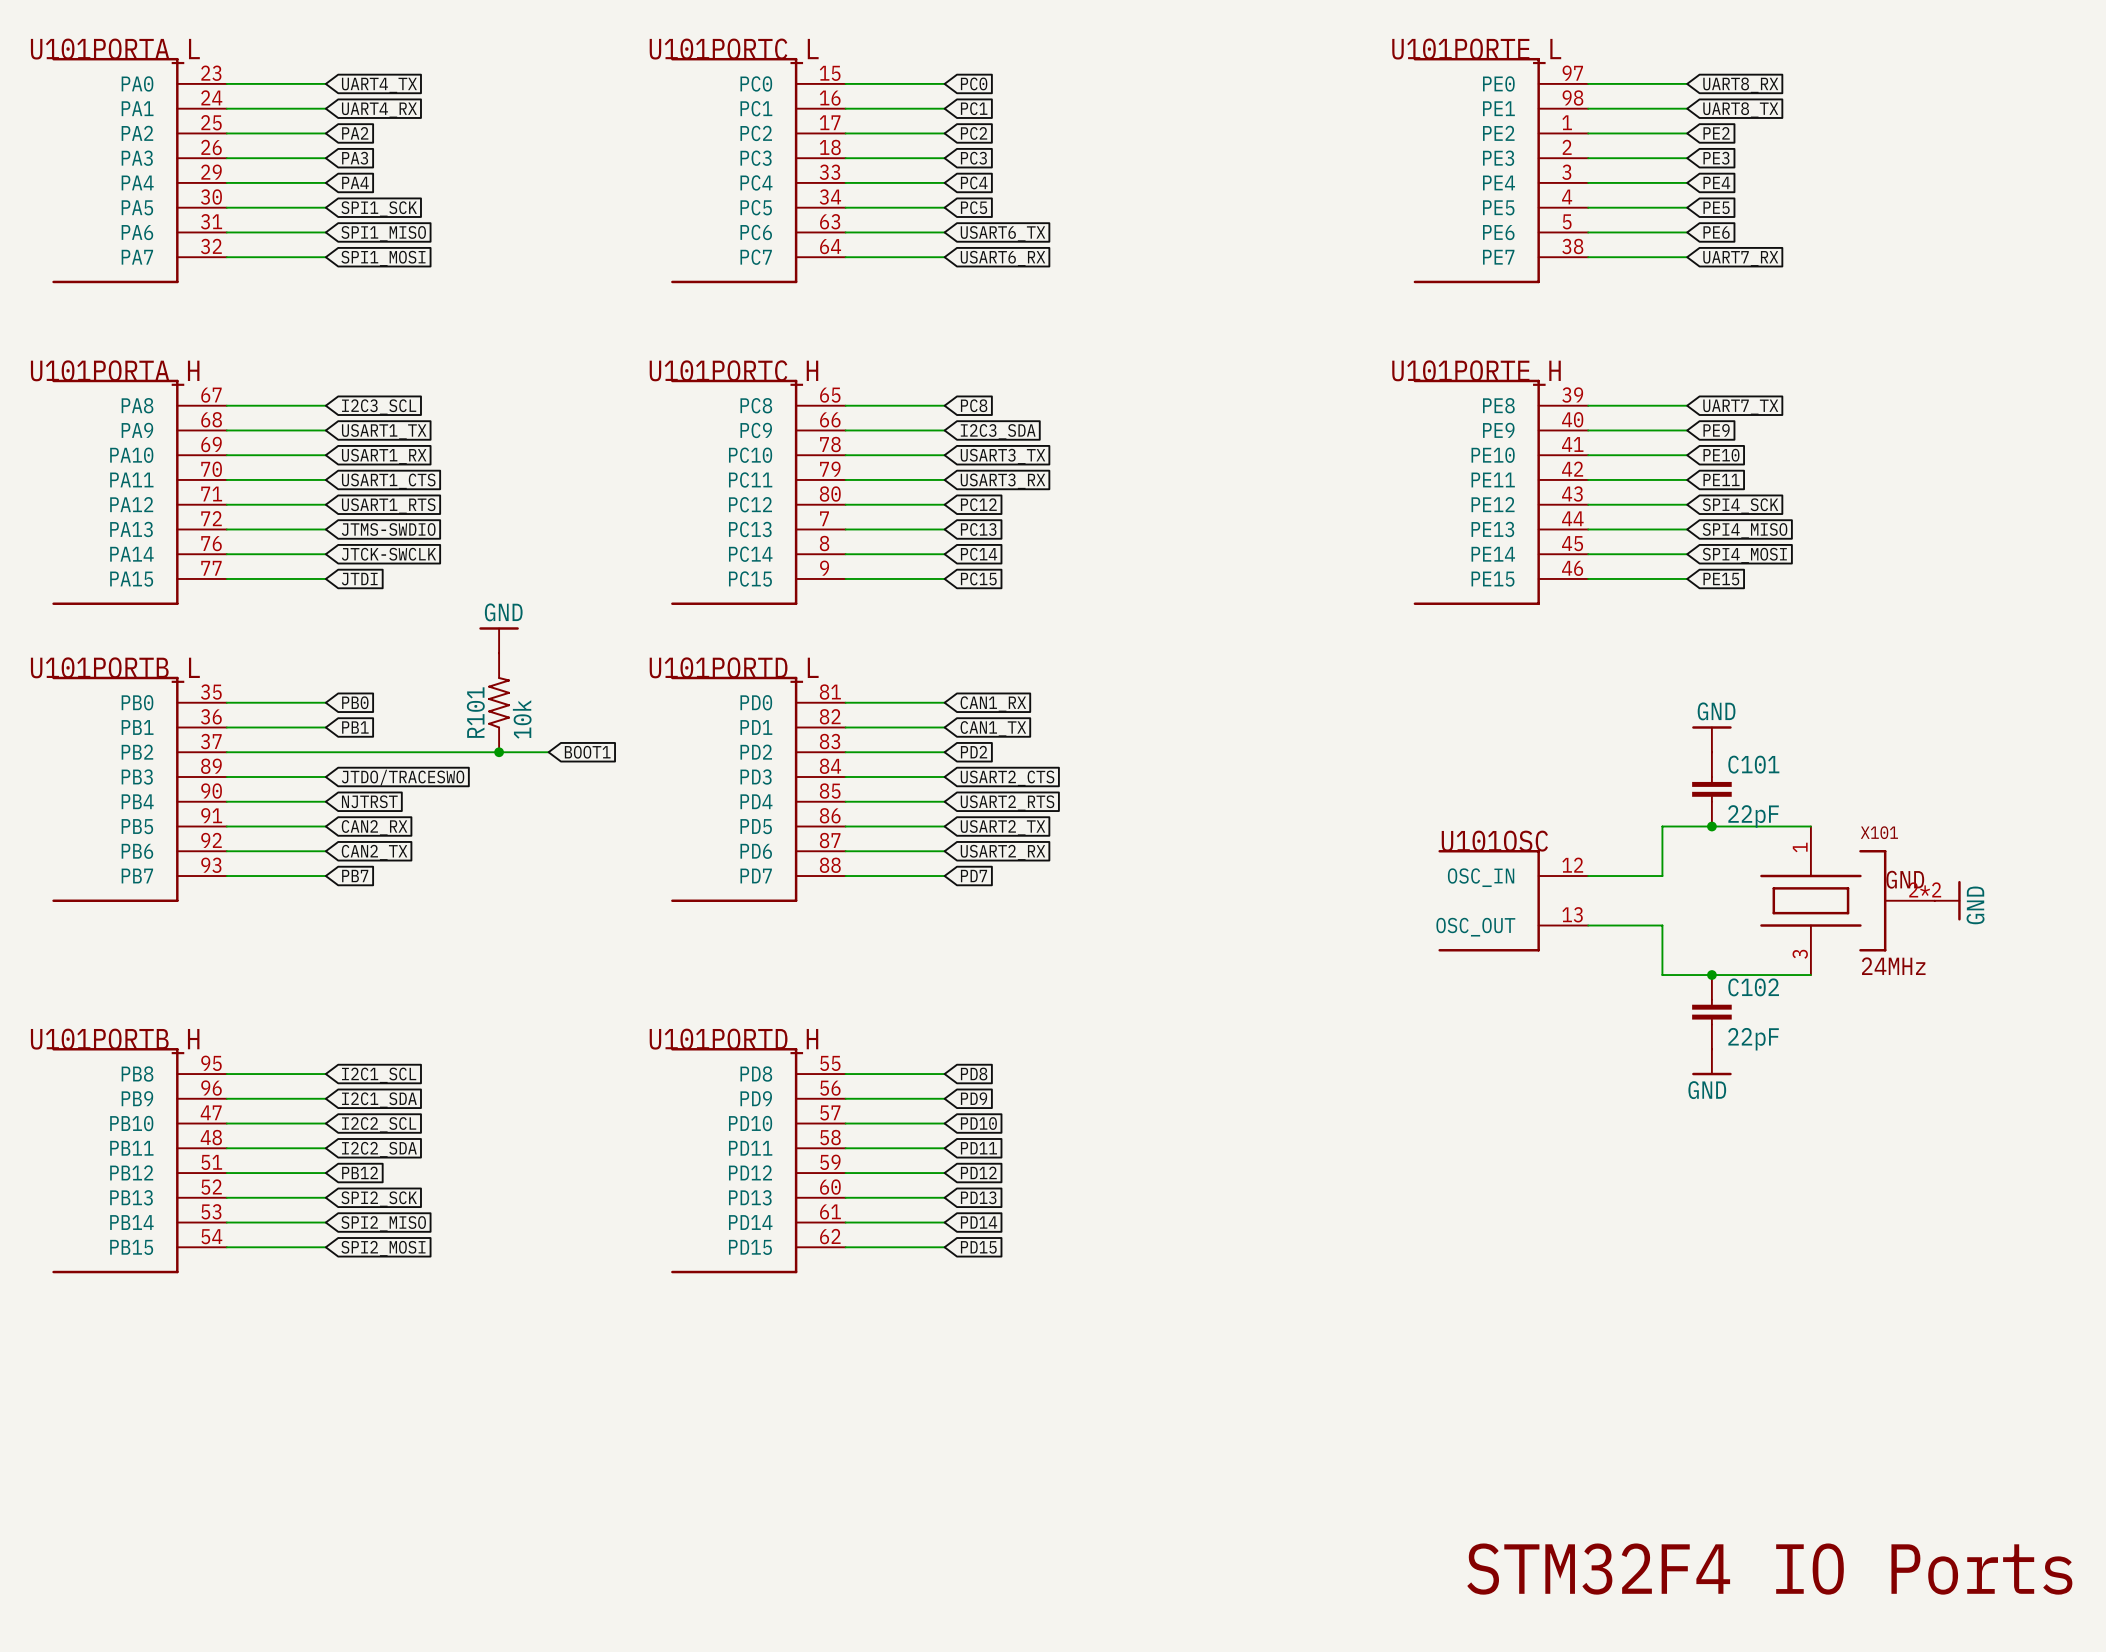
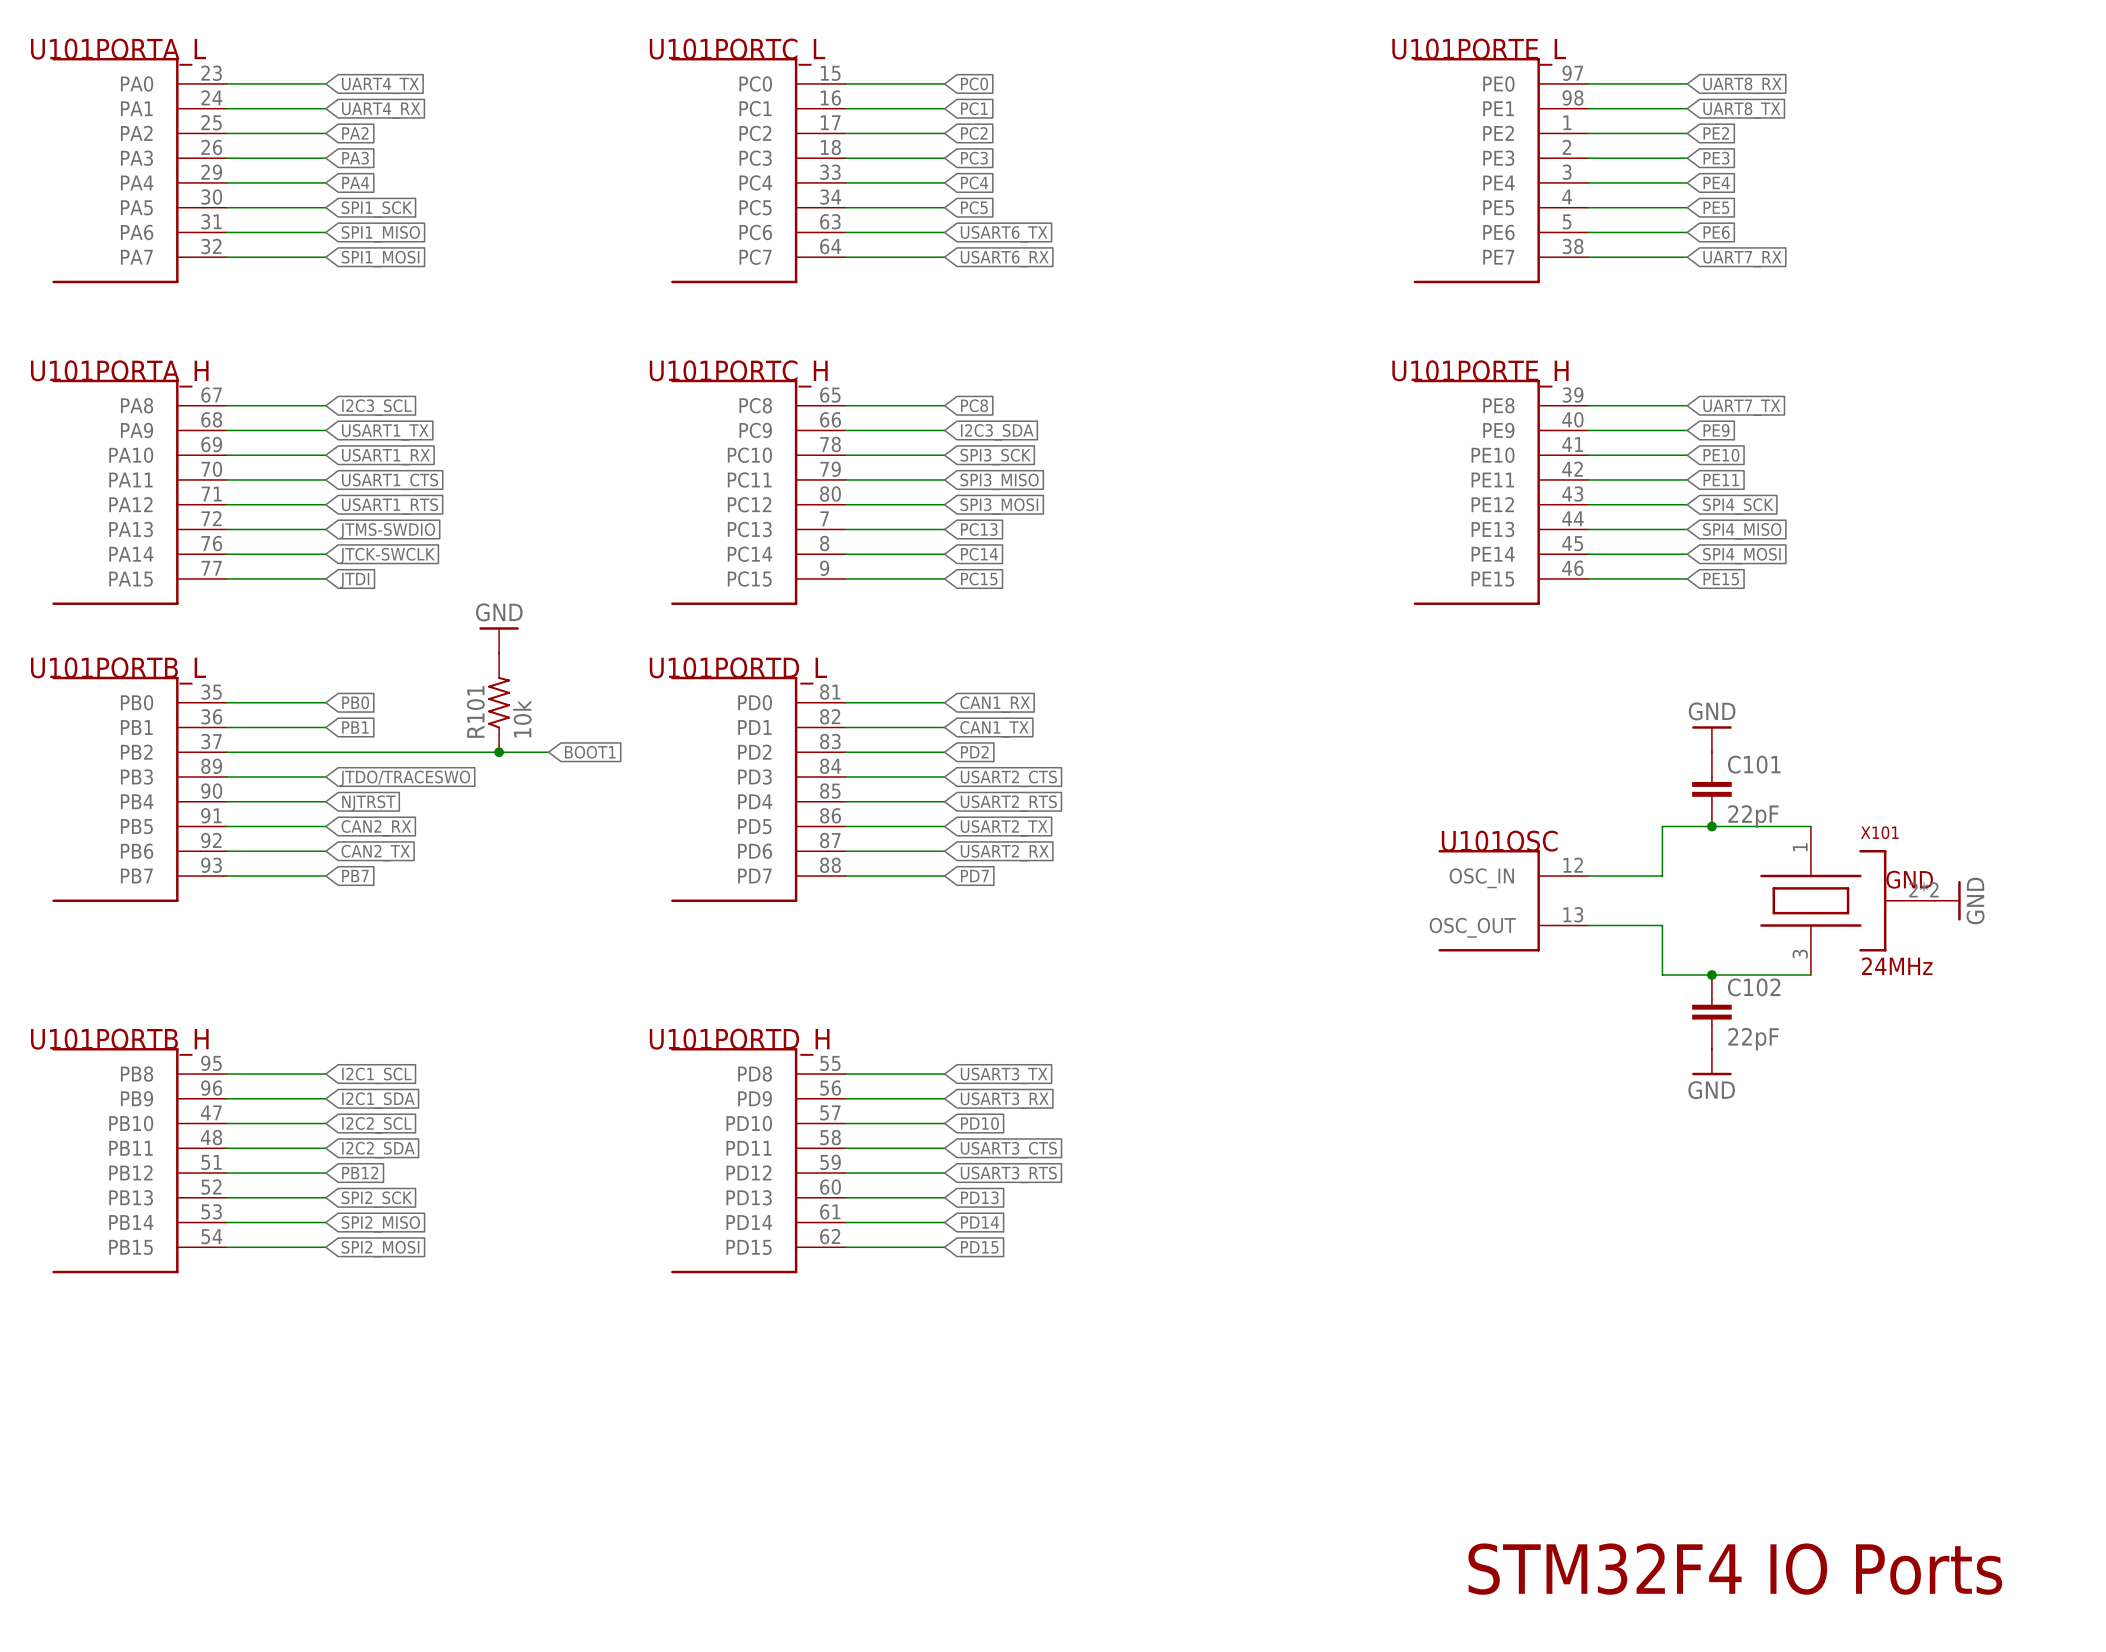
global label: USART3_TX (1002, 456) -> SPI3_SCK (995, 457)
global label: USART3_RX (1002, 481) -> SPI3_MISO (999, 481)
global label: PC12 (978, 504) -> SPI3_MOSI (999, 506)
global label: PD8 (974, 1074) -> USART3_TX (1004, 1075)
global label: PD9 (974, 1098) -> USART3_RX (1004, 1100)
global label: PD11 (978, 1148) -> USART3_CTS (1008, 1150)
global label: PD12 (978, 1172) -> USART3_RTS (1008, 1174)

